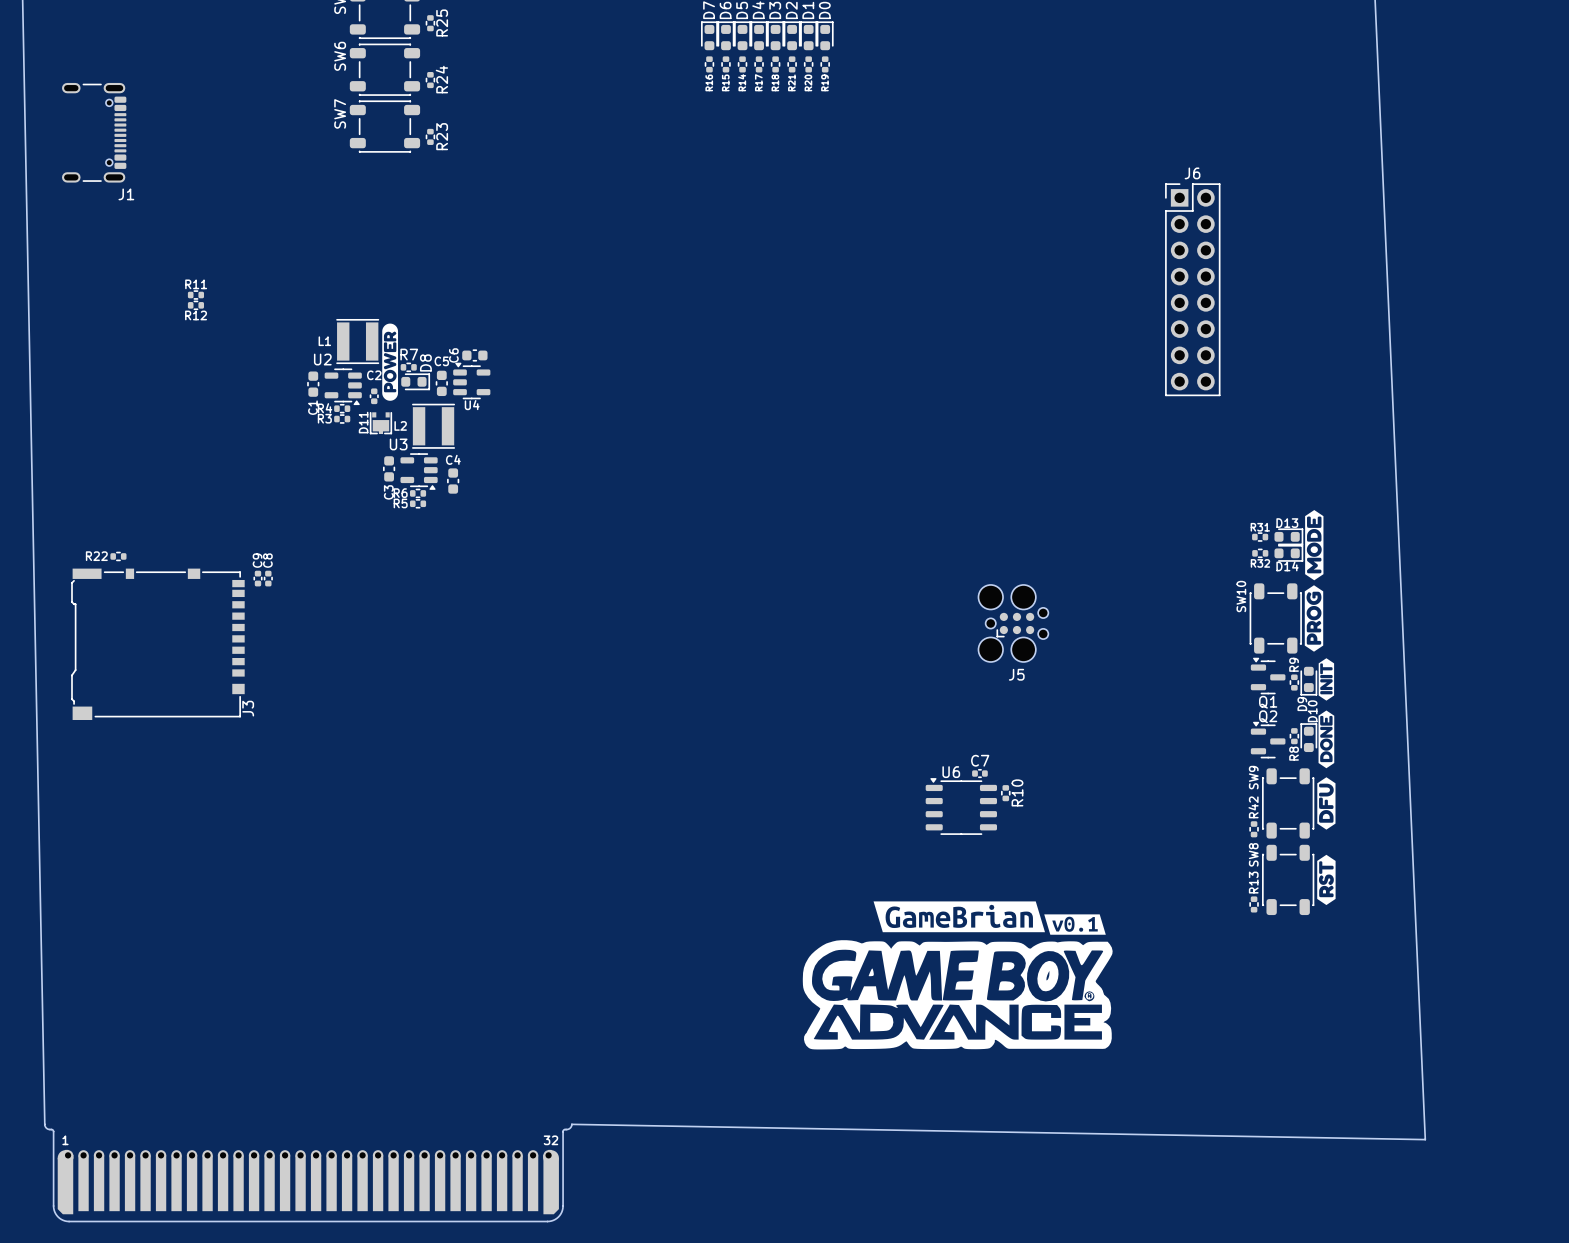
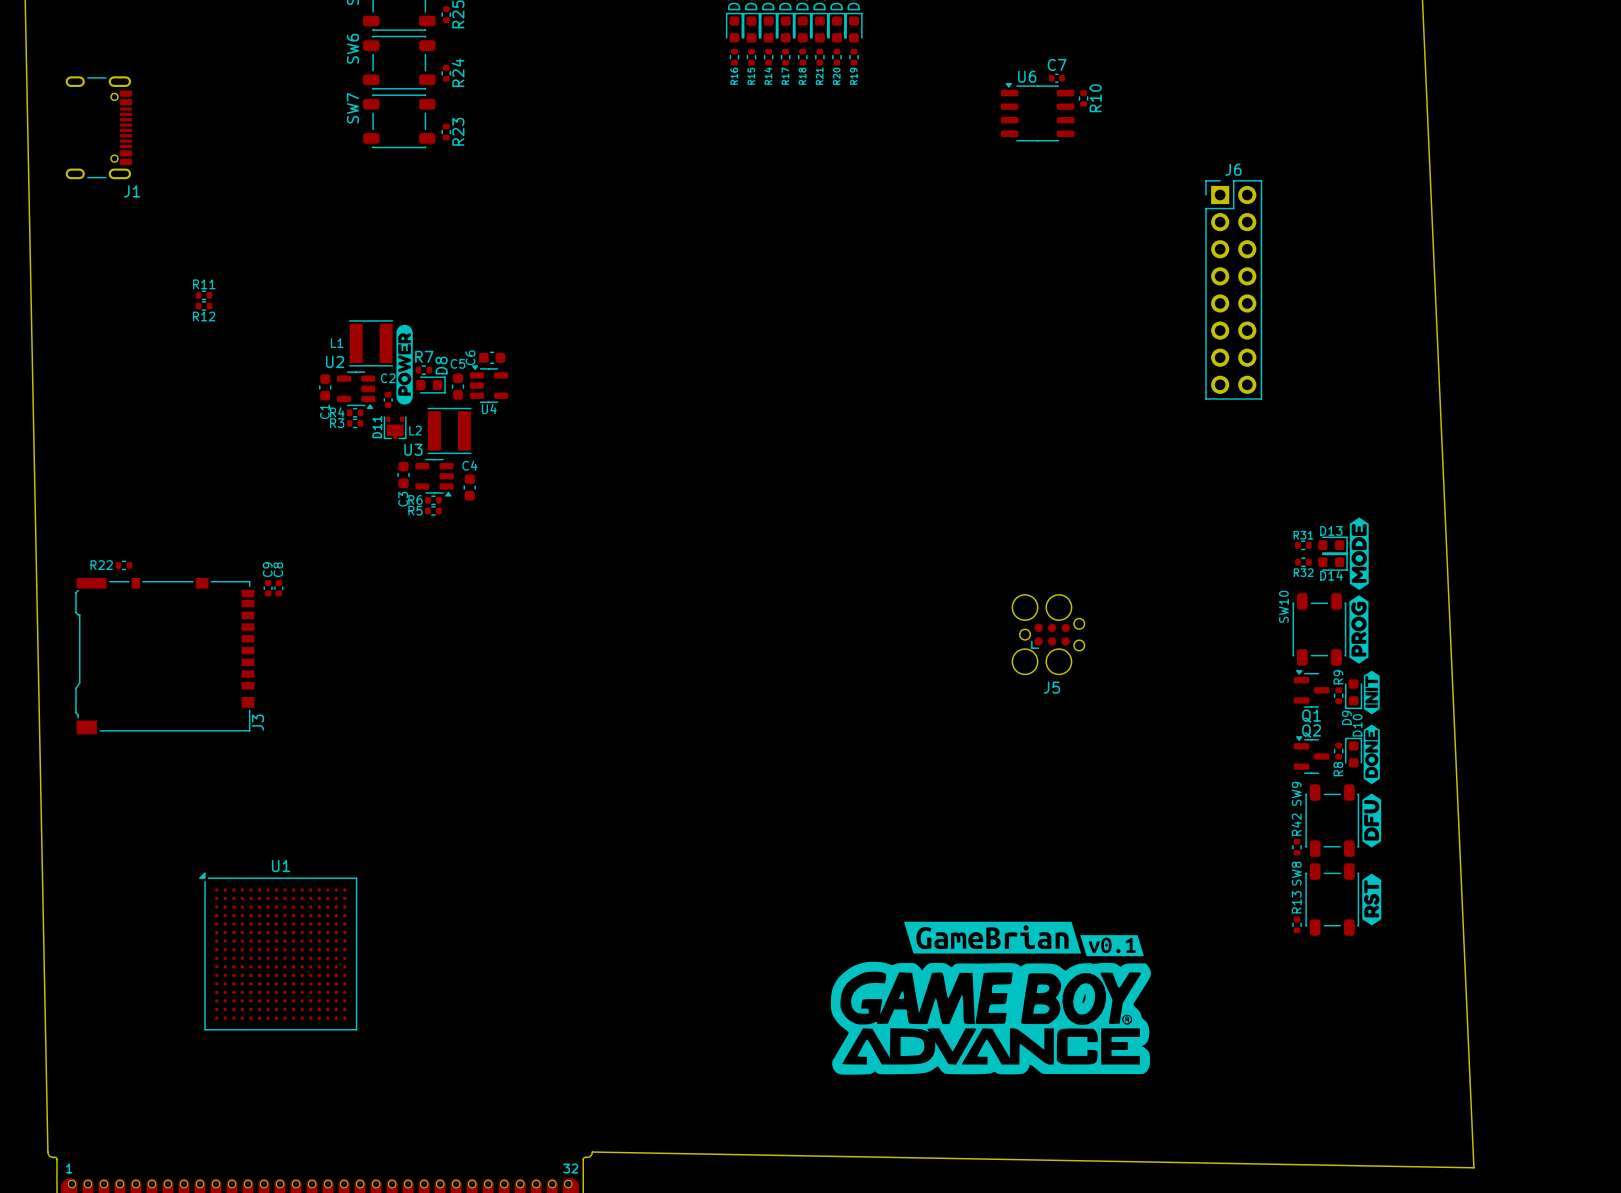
C7 position: (979, 773) -> (1056, 78)
R10 position: (1005, 793) -> (1083, 98)
U6 position: (961, 806) -> (1037, 112)
U1: none -> (278, 951)

